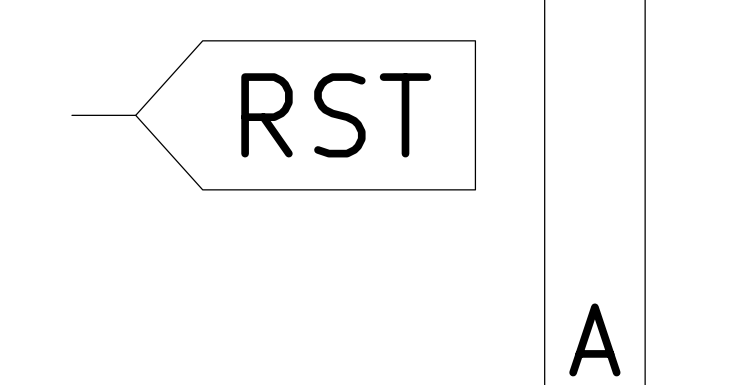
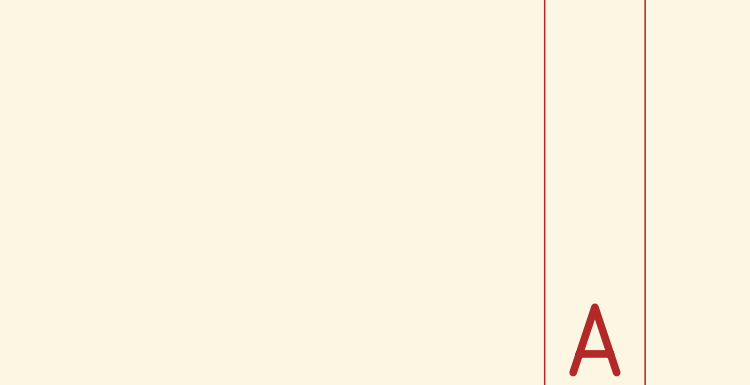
wire: (71, 115) (135, 115) -> none
global label: RST (336, 115) -> none

